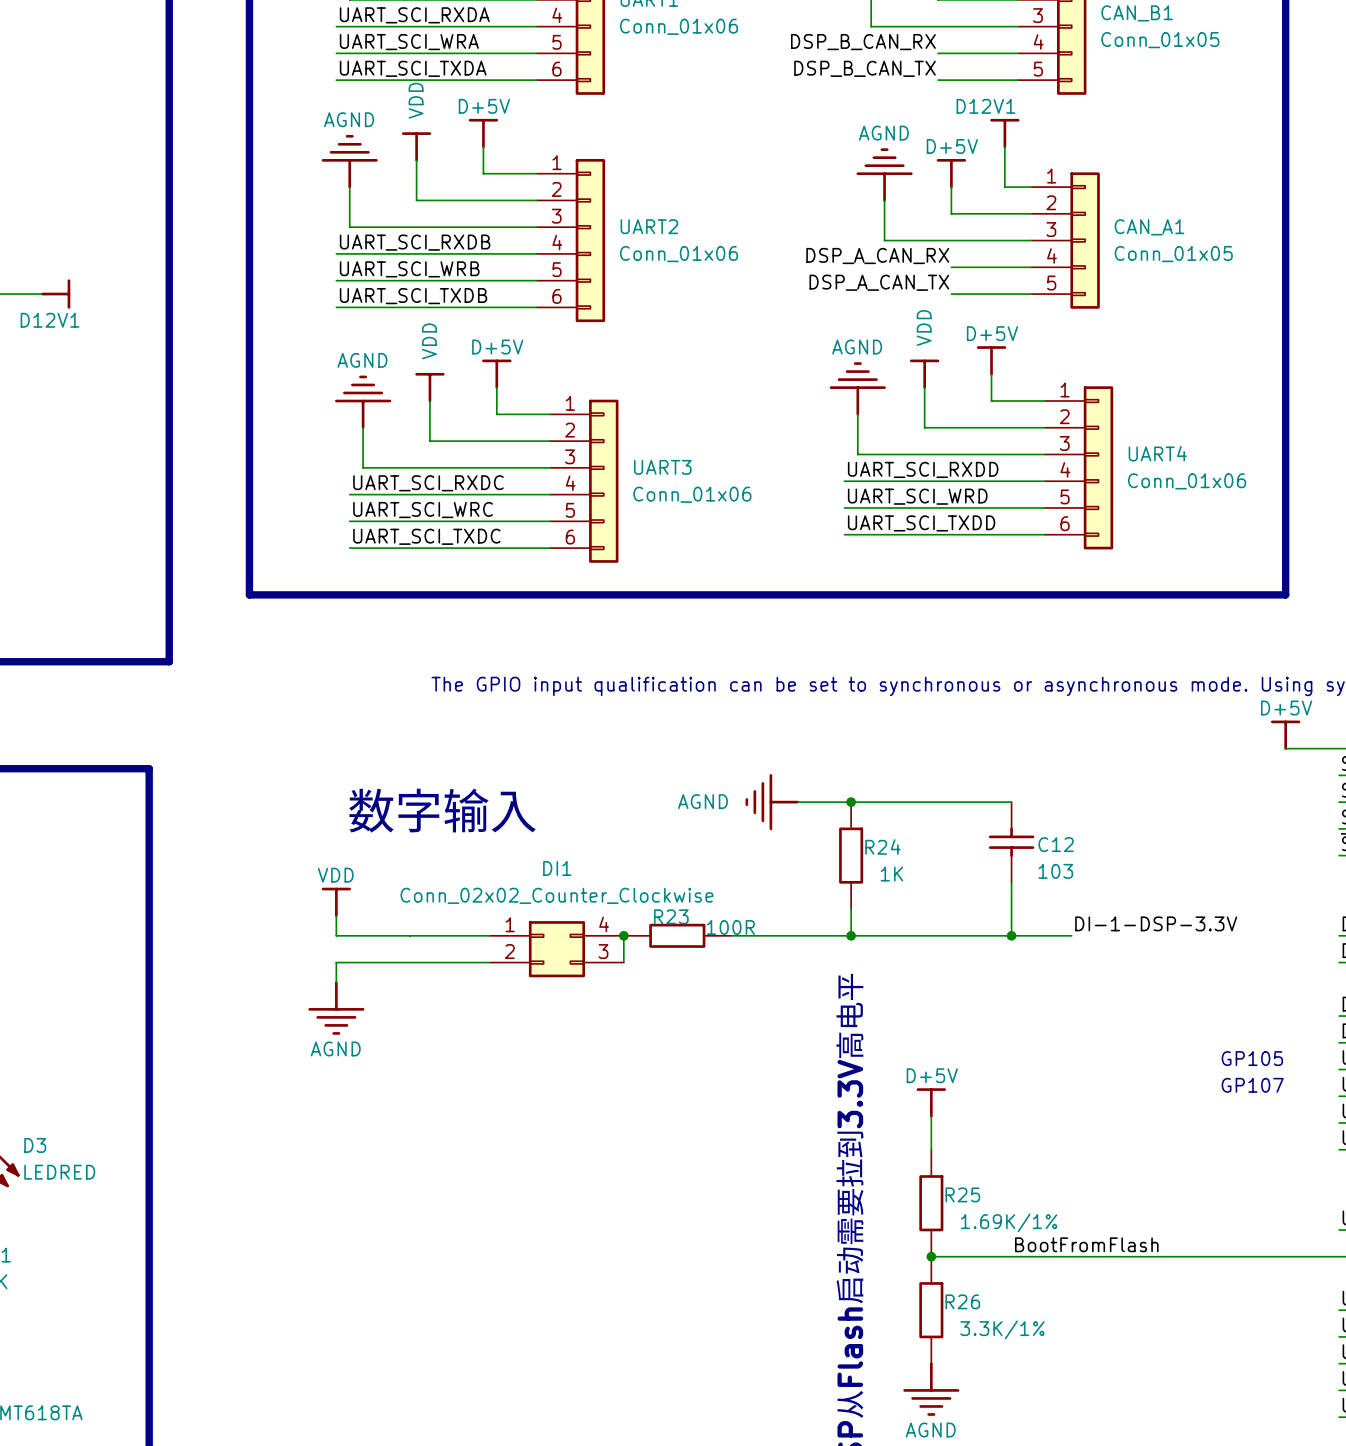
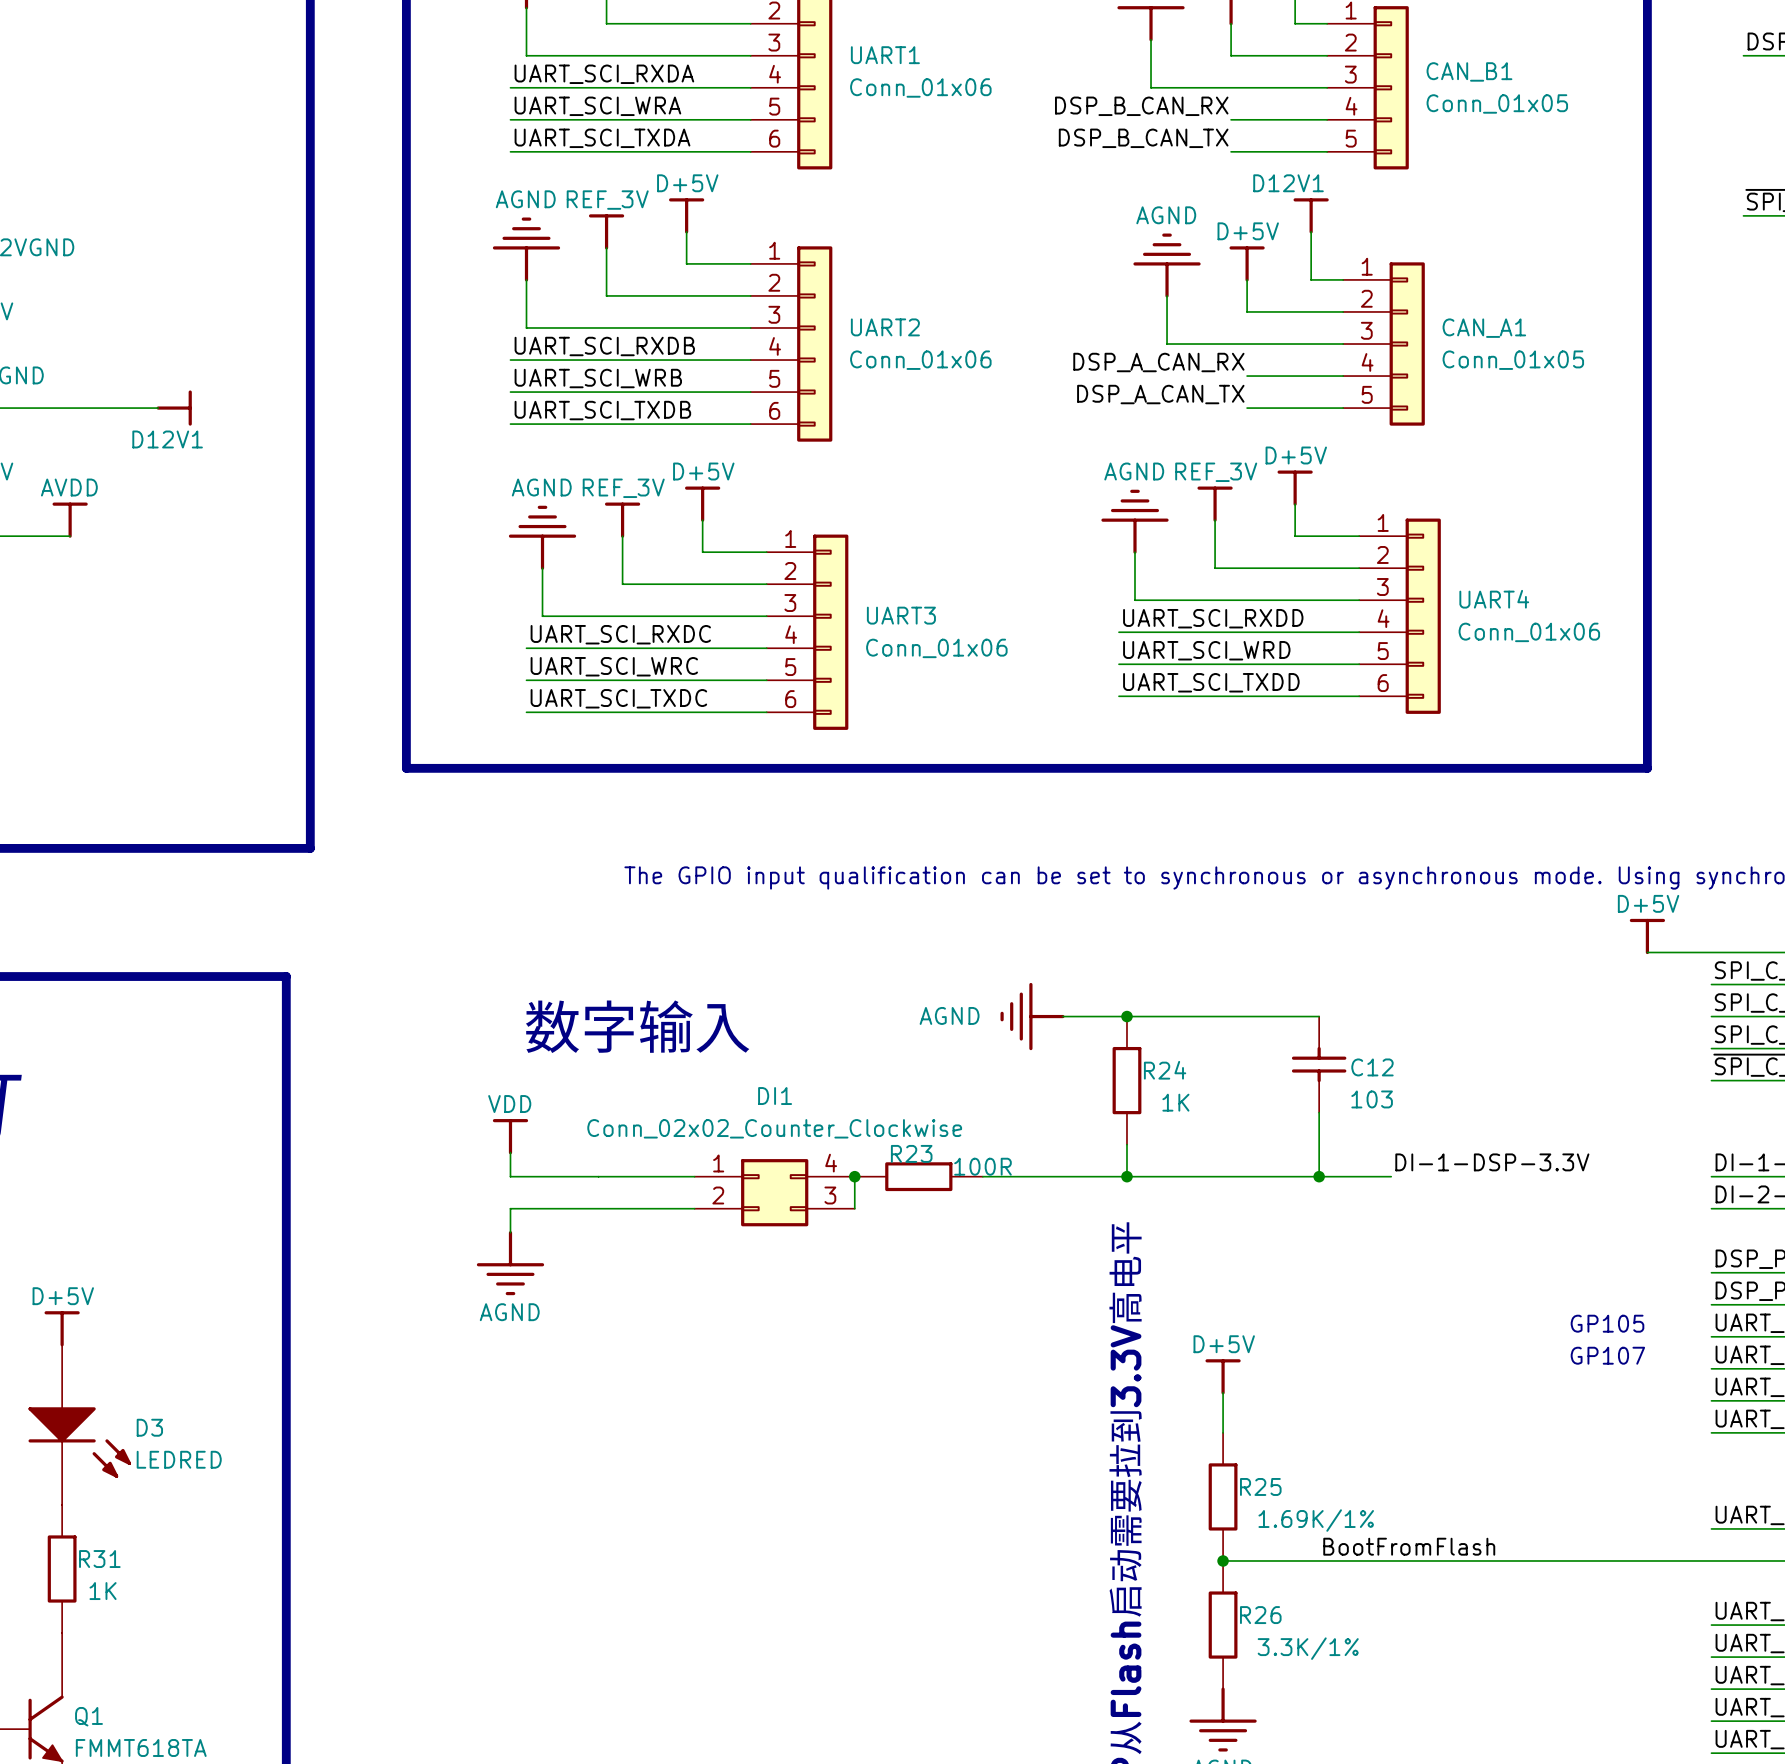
power symbol: VDD (416, 146) -> REF_3V (606, 231)
power symbol: VDD (924, 374) -> REF_3V (1215, 504)
power symbol: VDD (429, 387) -> REF_3V (622, 520)

